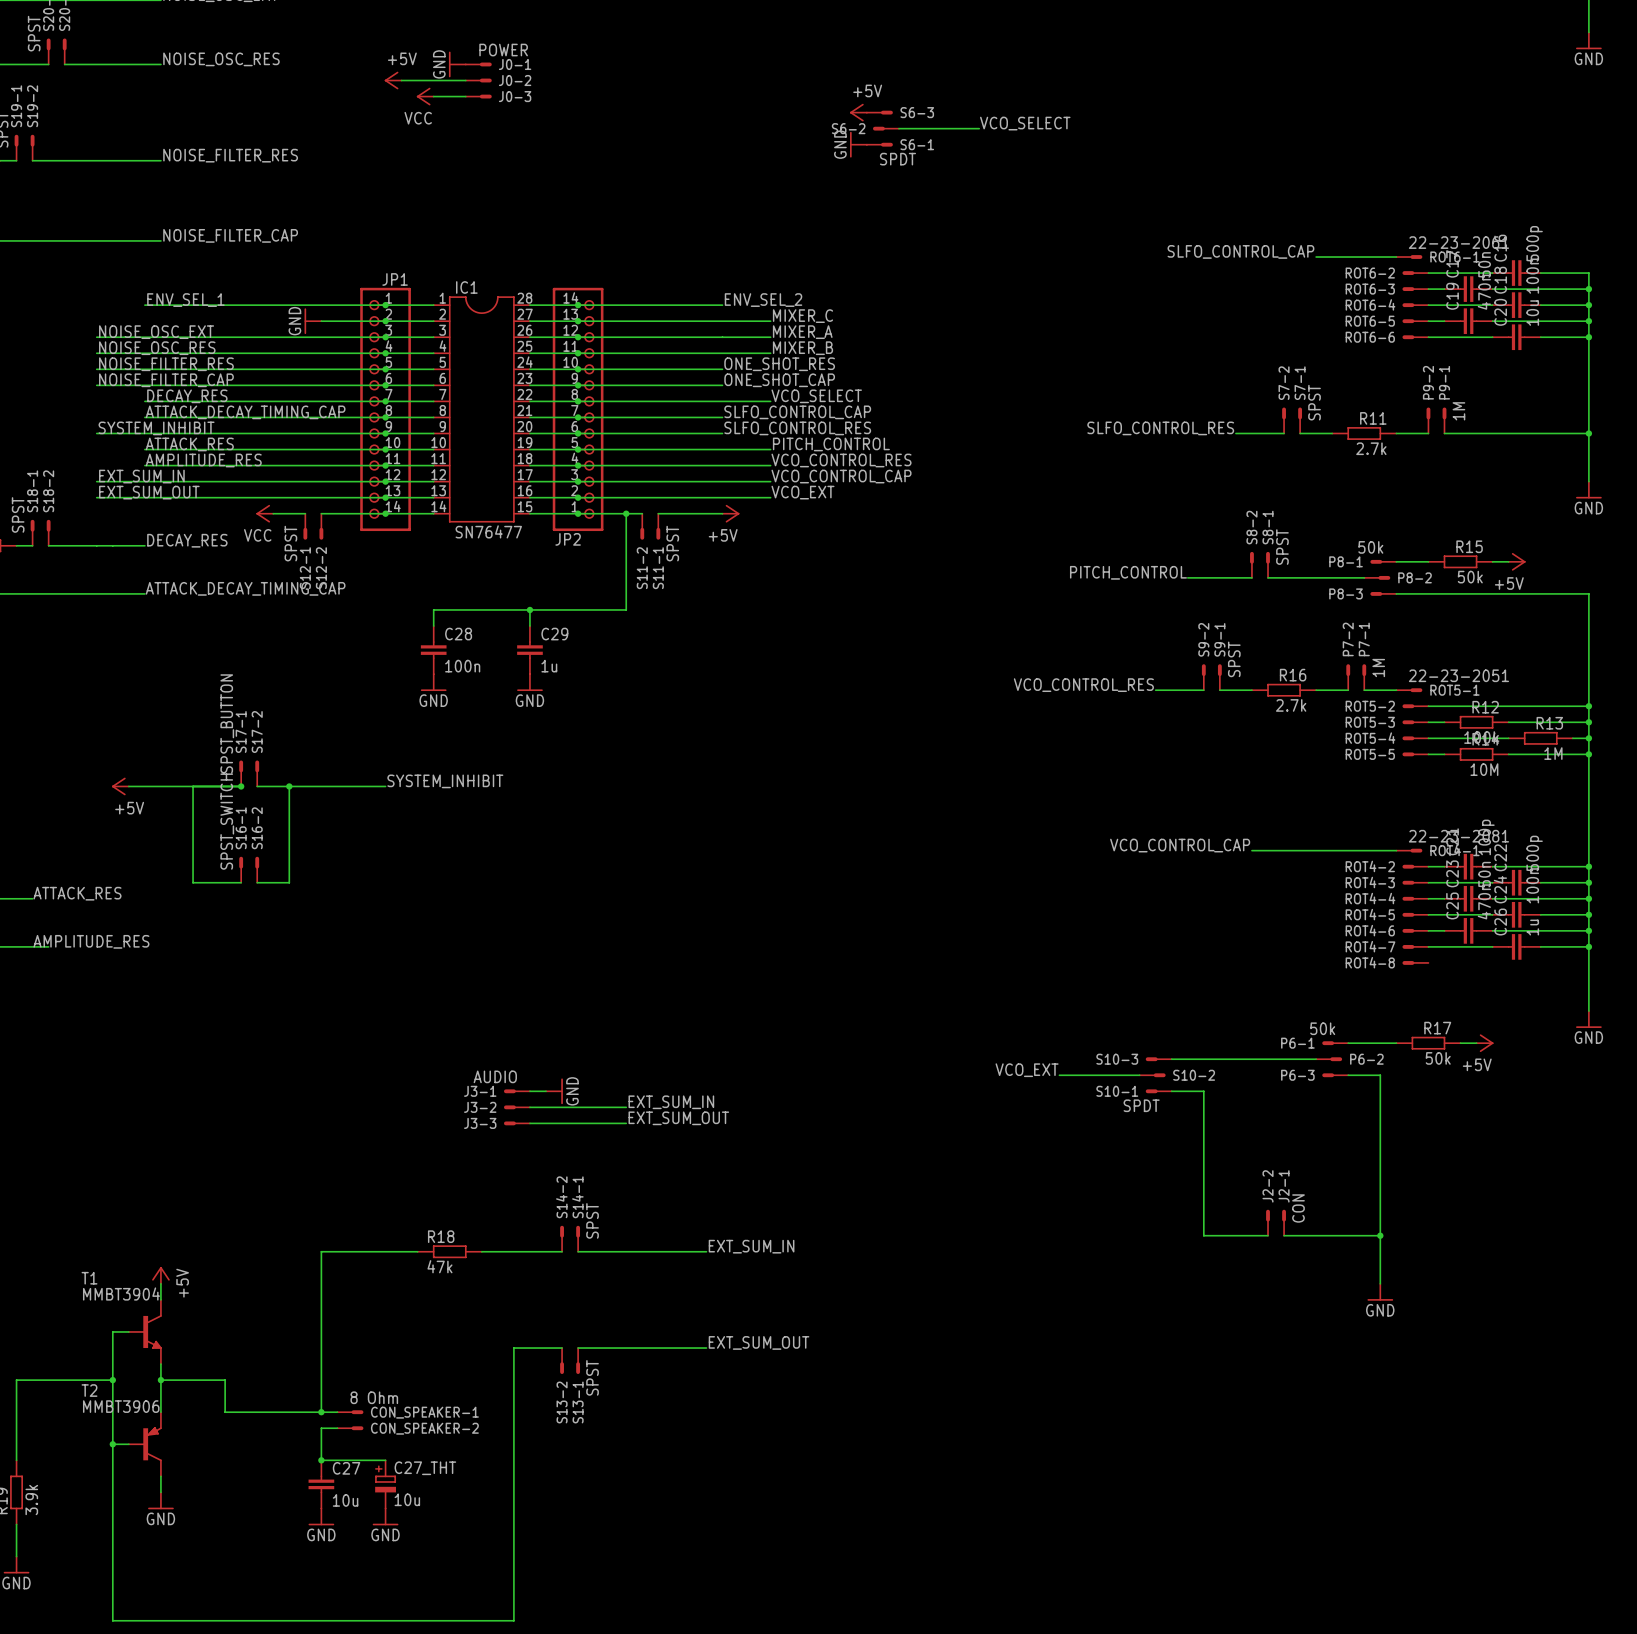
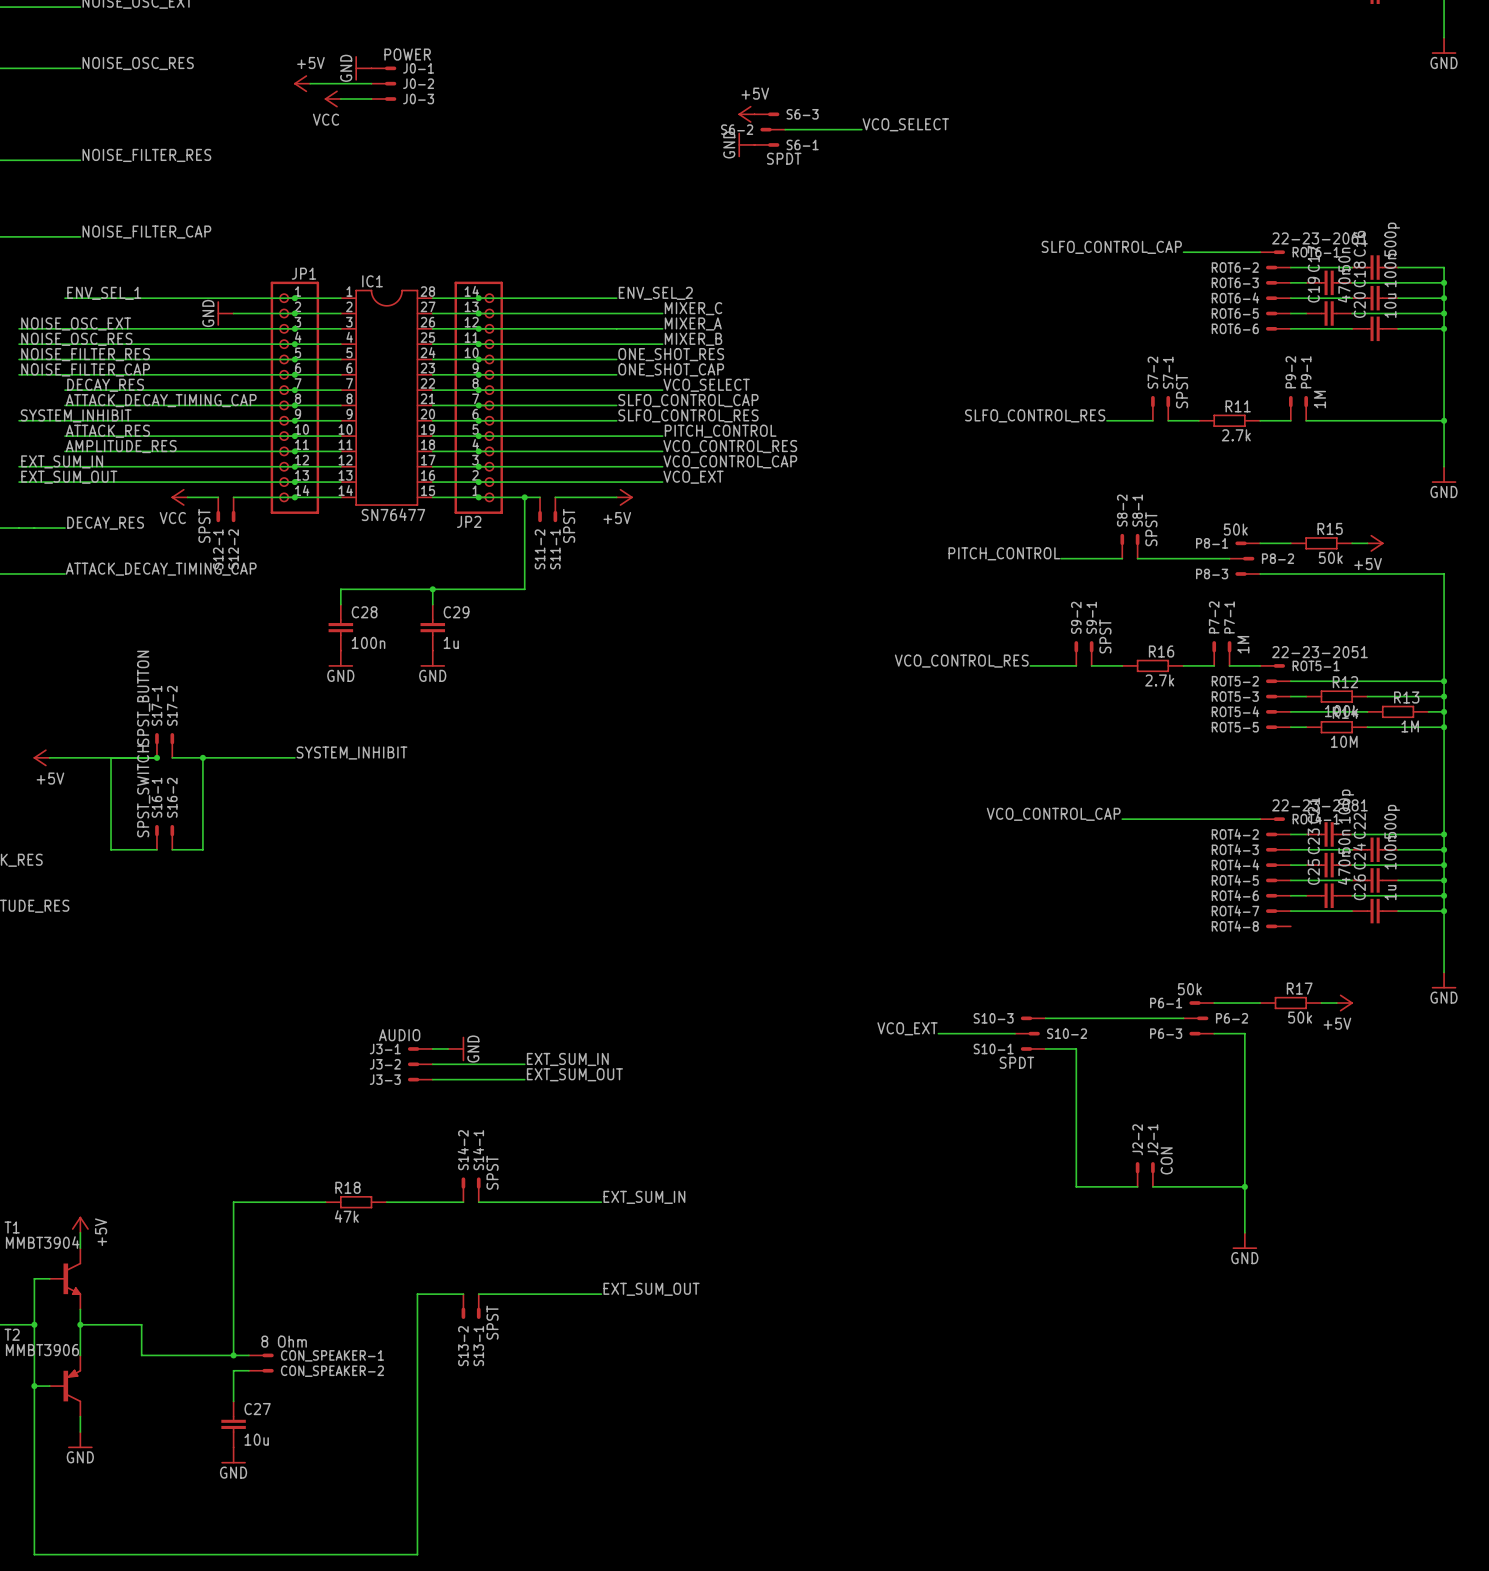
wire: (321, 1460) (385, 1460) -> none
junction: (321, 1460) -> none
C27_THT: 10u (385, 1484) -> none
power symbol: GND (385, 1516) -> none

